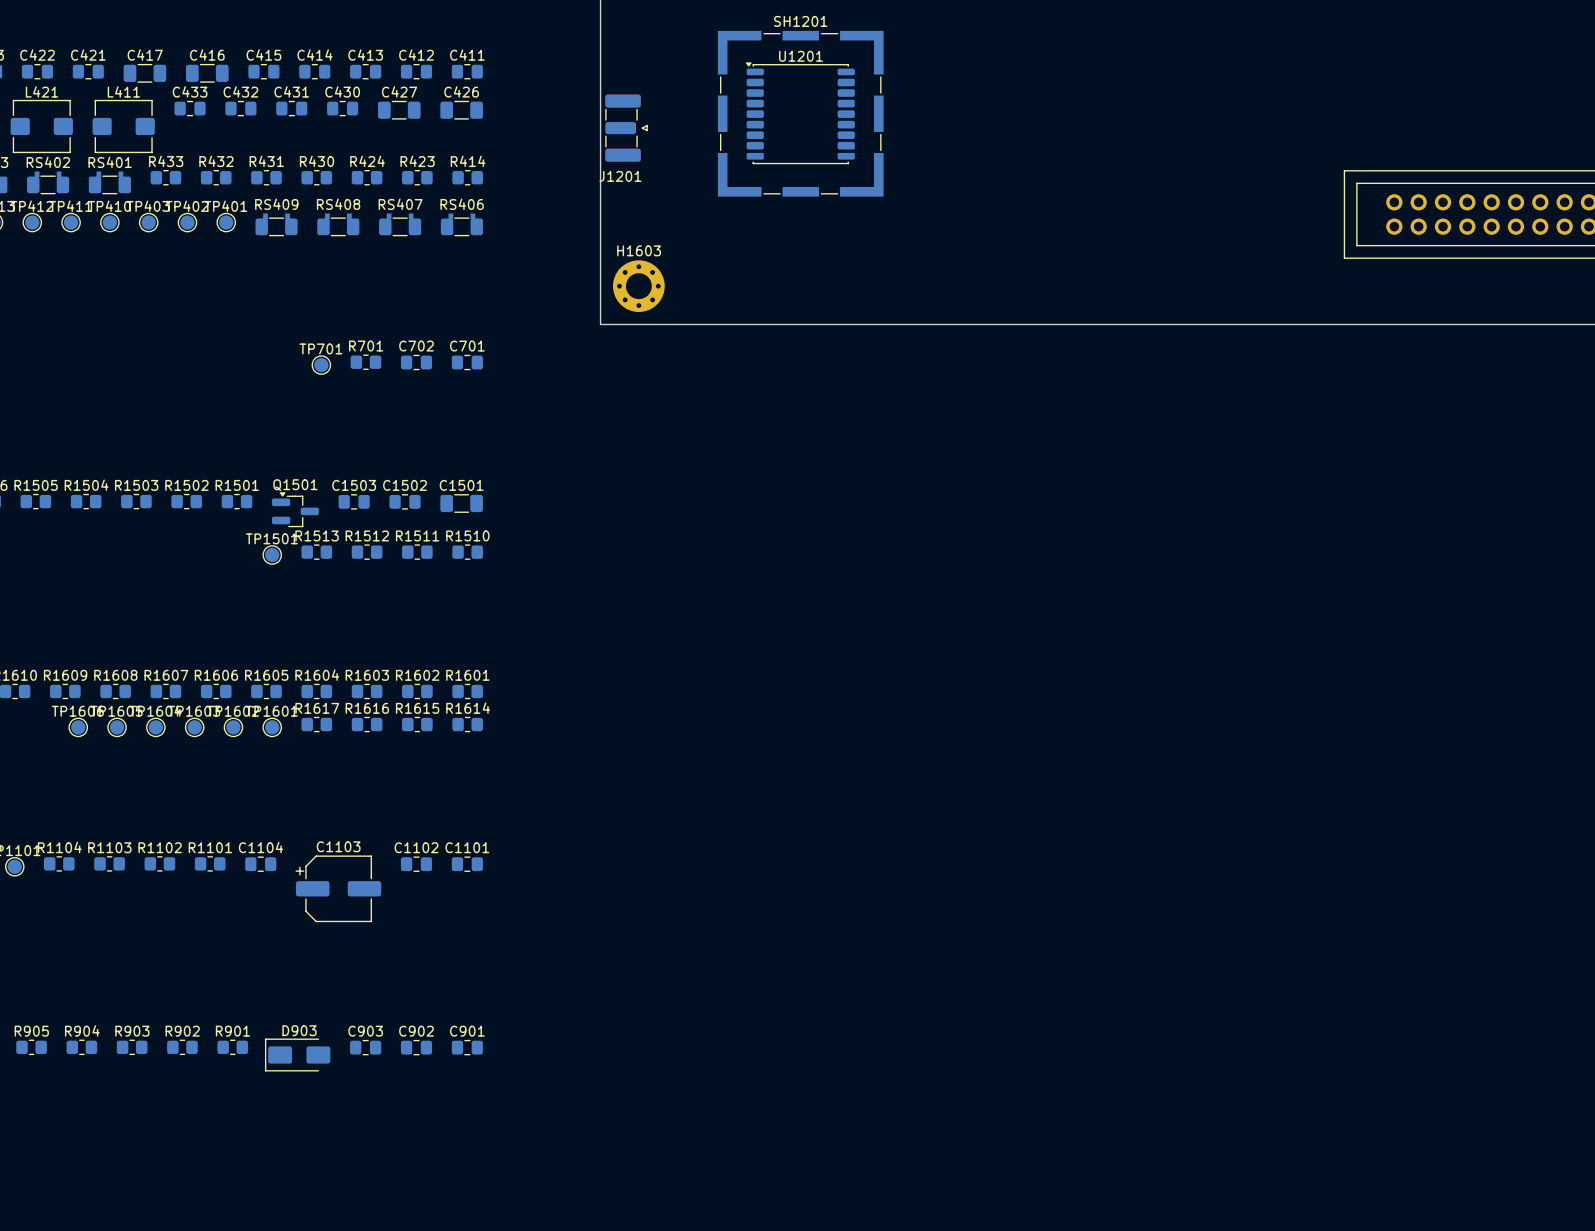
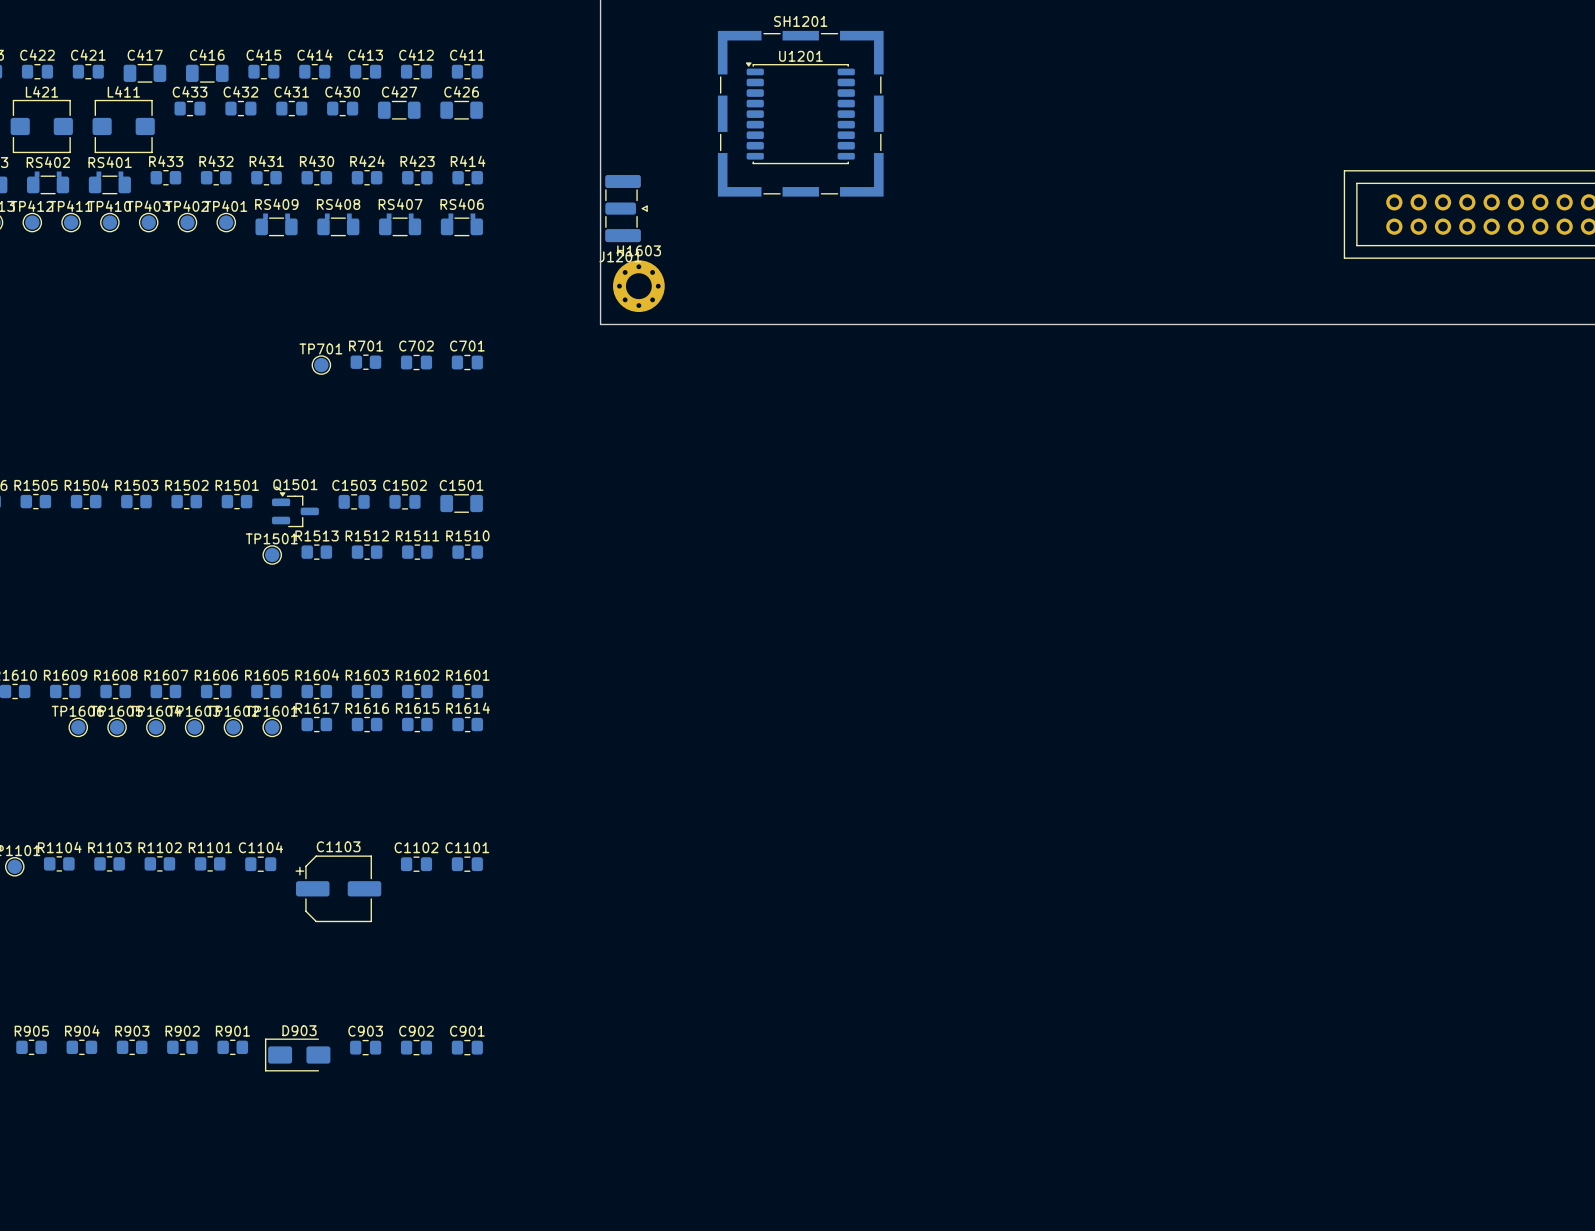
J1201 position: (626, 128) -> (626, 208)

